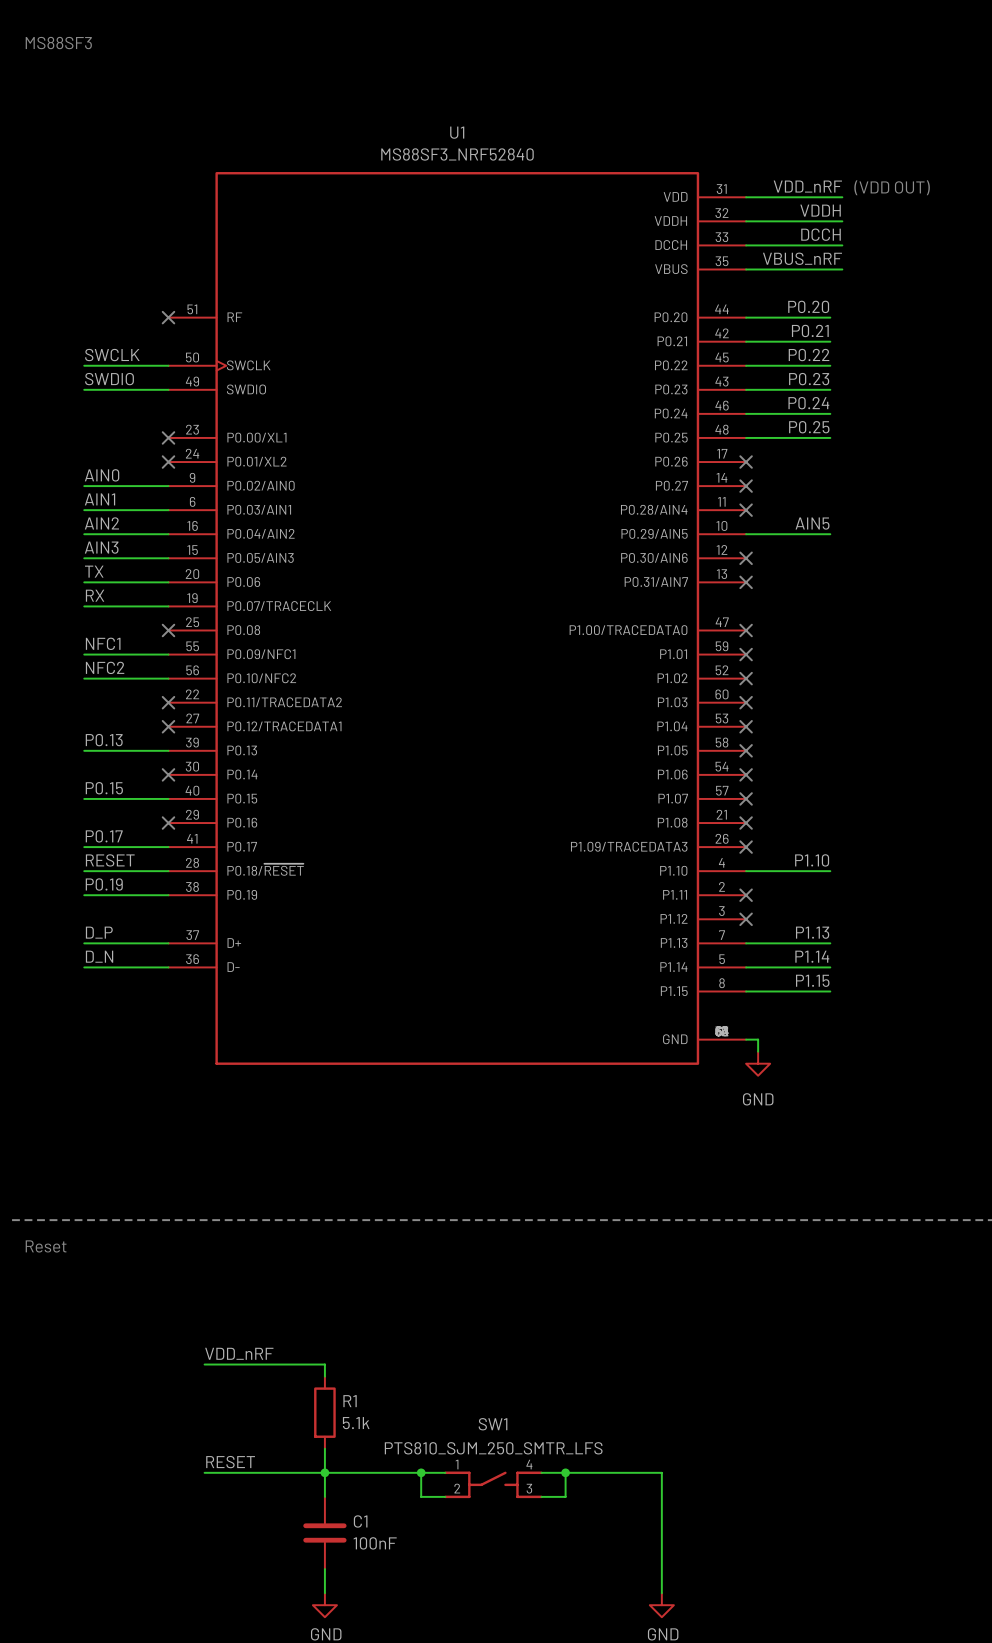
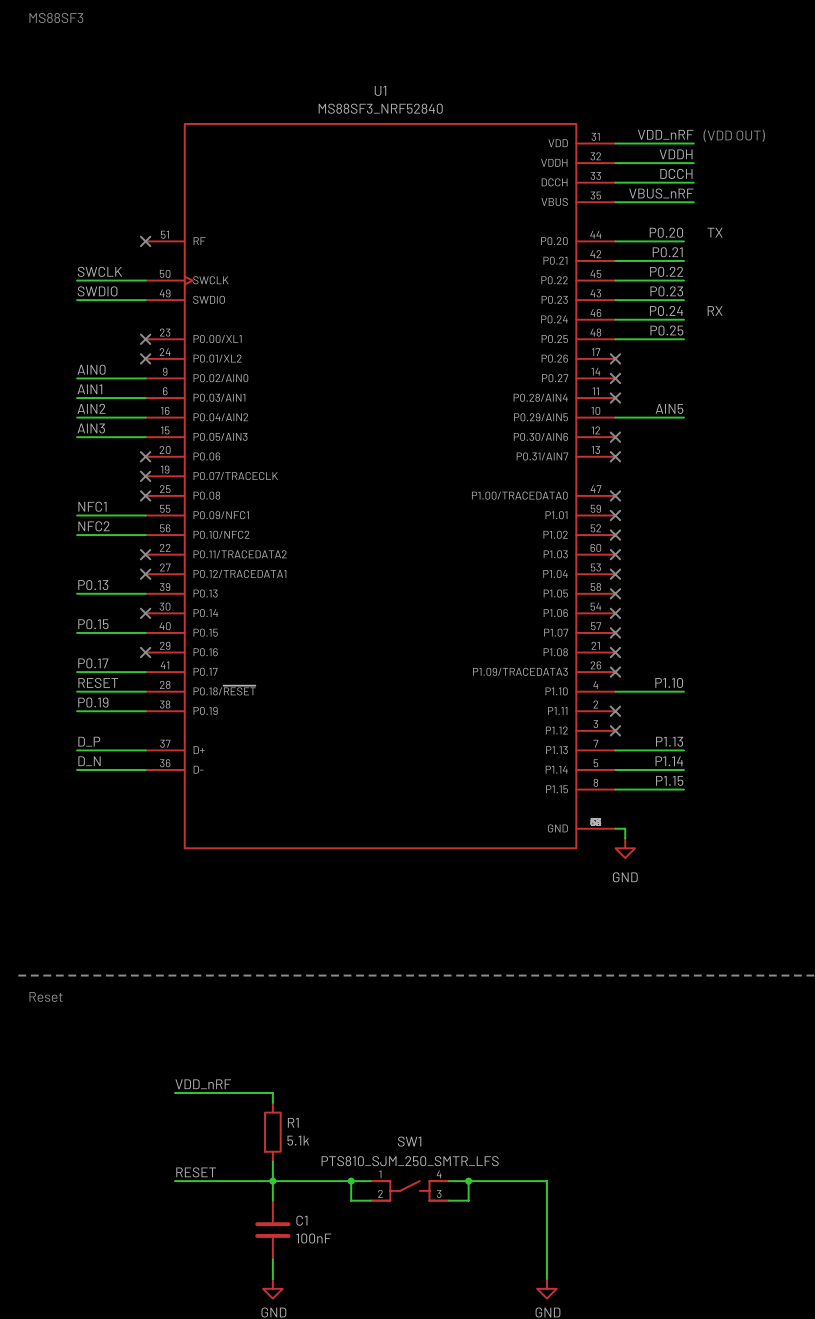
label: none -> TX (715, 232)
label: none -> RX (715, 310)
label: TX (94, 571) -> none
wire: (84, 582) (168, 582) -> none
no-connect mark: none -> (145, 456)
label: RX (95, 595) -> none
wire: (84, 606) (168, 606) -> none
no-connect mark: none -> (145, 476)

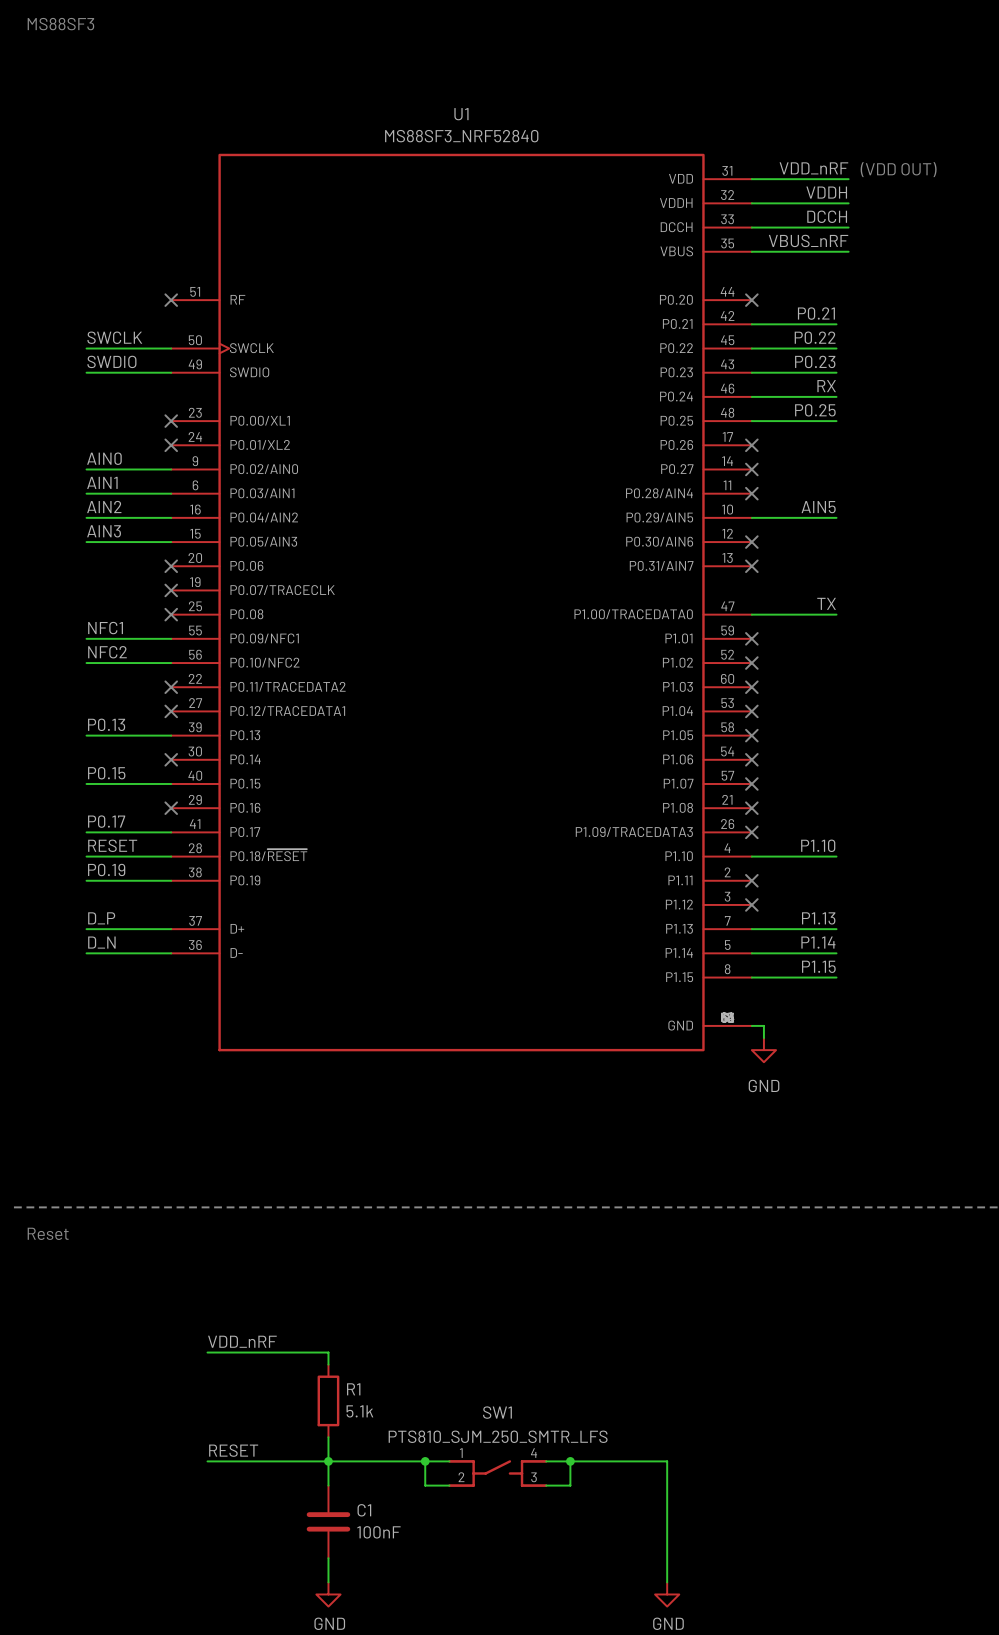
label: P0.20 (666, 232) -> none
label: TX (715, 232) -> none
wire: (615, 241) (683, 241) -> none
no-connect mark: none -> (751, 300)
label: P0.24 (666, 310) -> RX (826, 386)
label: RX (715, 310) -> none
label: none -> TX (826, 603)
wire: none -> (751, 614) (836, 614)
no-connect mark: (615, 495) -> none

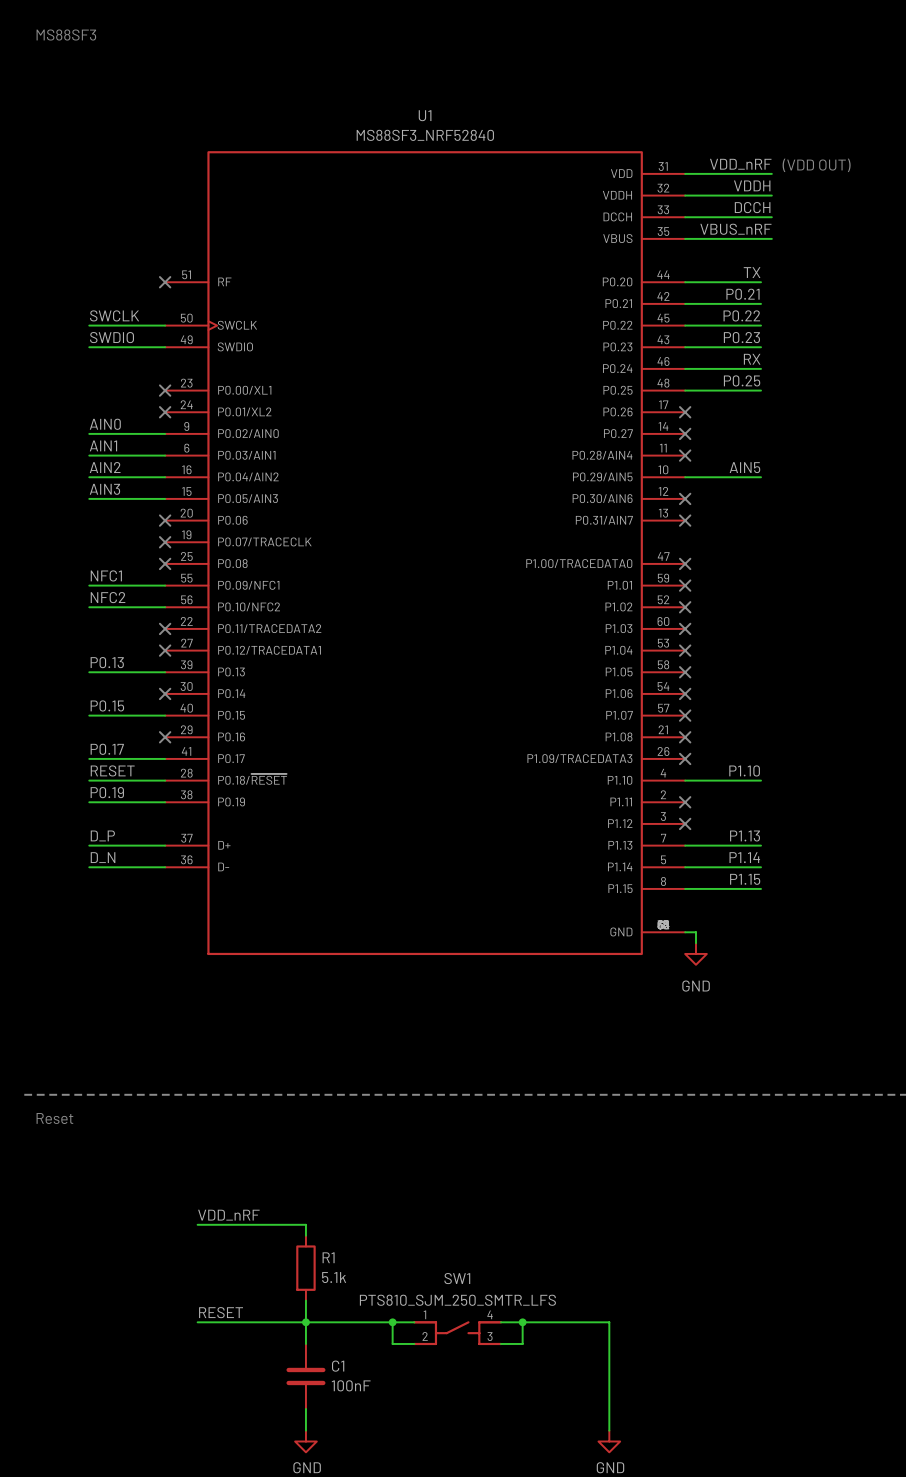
label: none -> TX (752, 272)
wire: none -> (685, 282) (761, 282)
no-connect mark: (751, 300) -> none
label: TX (826, 603) -> none
wire: (751, 614) (836, 614) -> none
no-connect mark: none -> (685, 563)

